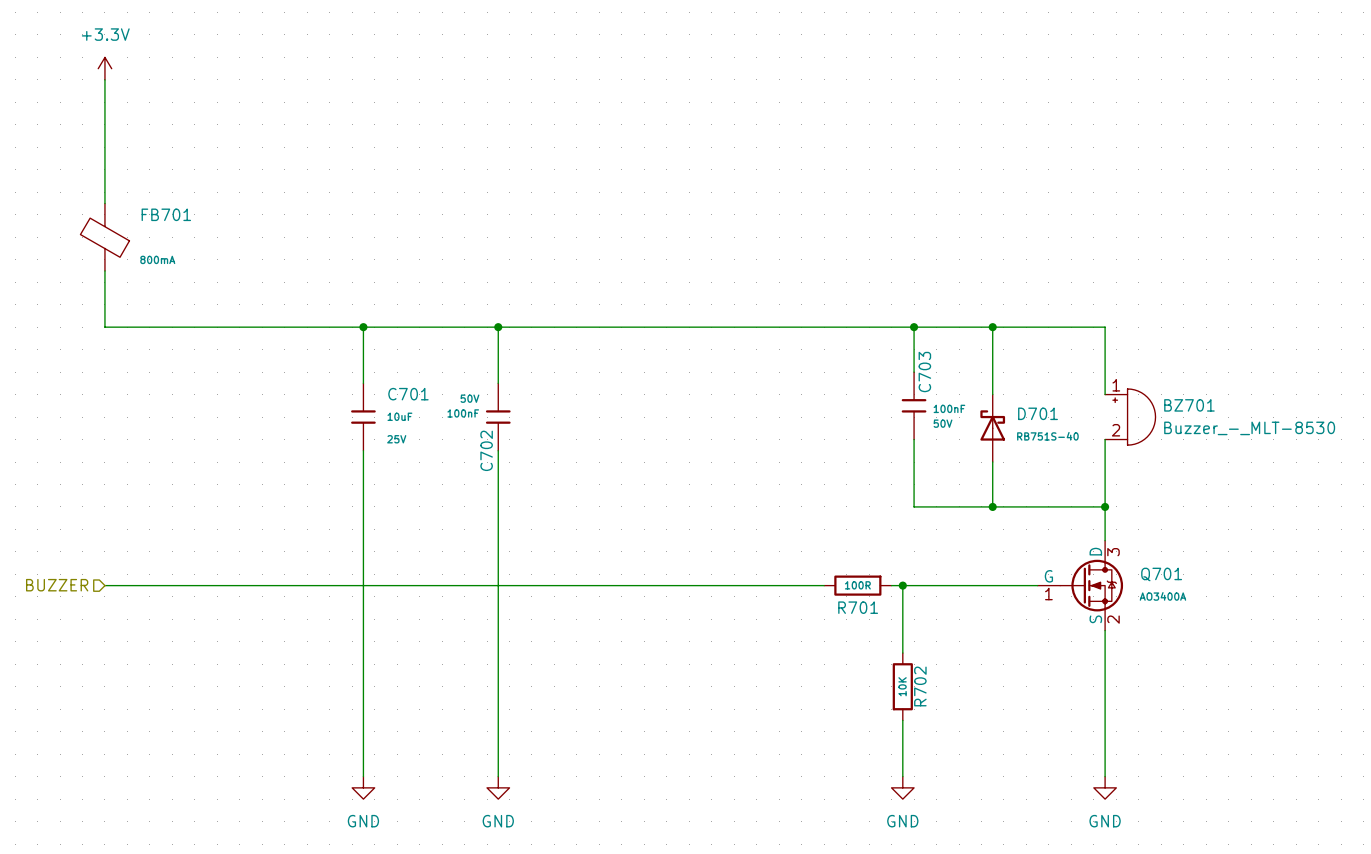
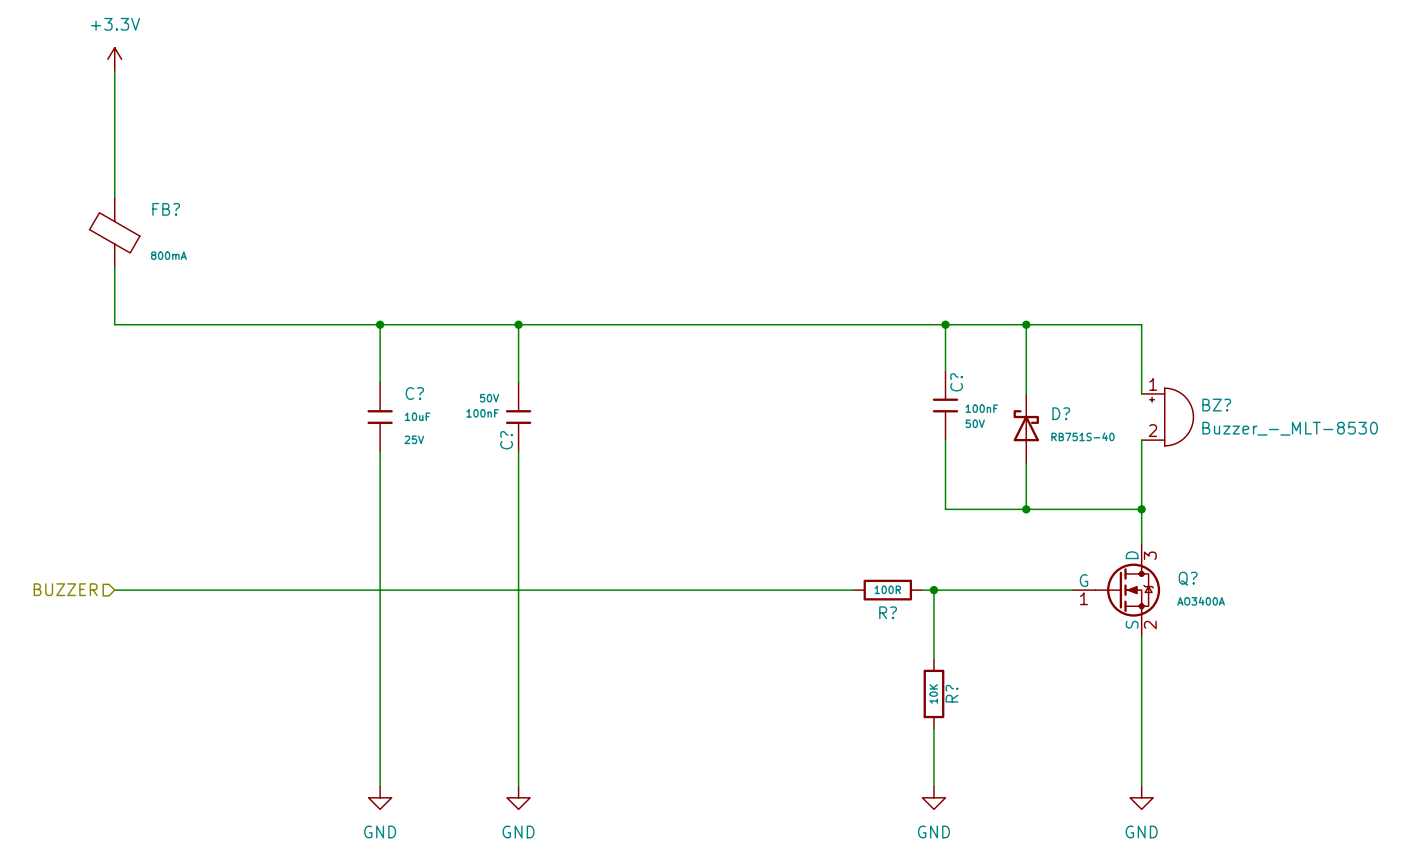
FB701 name: FB701 (166, 214) -> FB? (166, 209)
C703 name: C703 (924, 372) -> C? (956, 382)
C701 name: C701 (408, 394) -> C? (414, 393)
BZ701 name: BZ701 (1189, 405) -> BZ? (1216, 405)
D701 name: D701 (1038, 413) -> D? (1061, 413)
C702 name: C702 (486, 450) -> C? (506, 440)
Q701 name: Q701 (1161, 574) -> Q? (1188, 578)
R701 name: R701 (858, 607) -> R? (888, 612)
R702 name: R702 (920, 686) -> R? (952, 693)

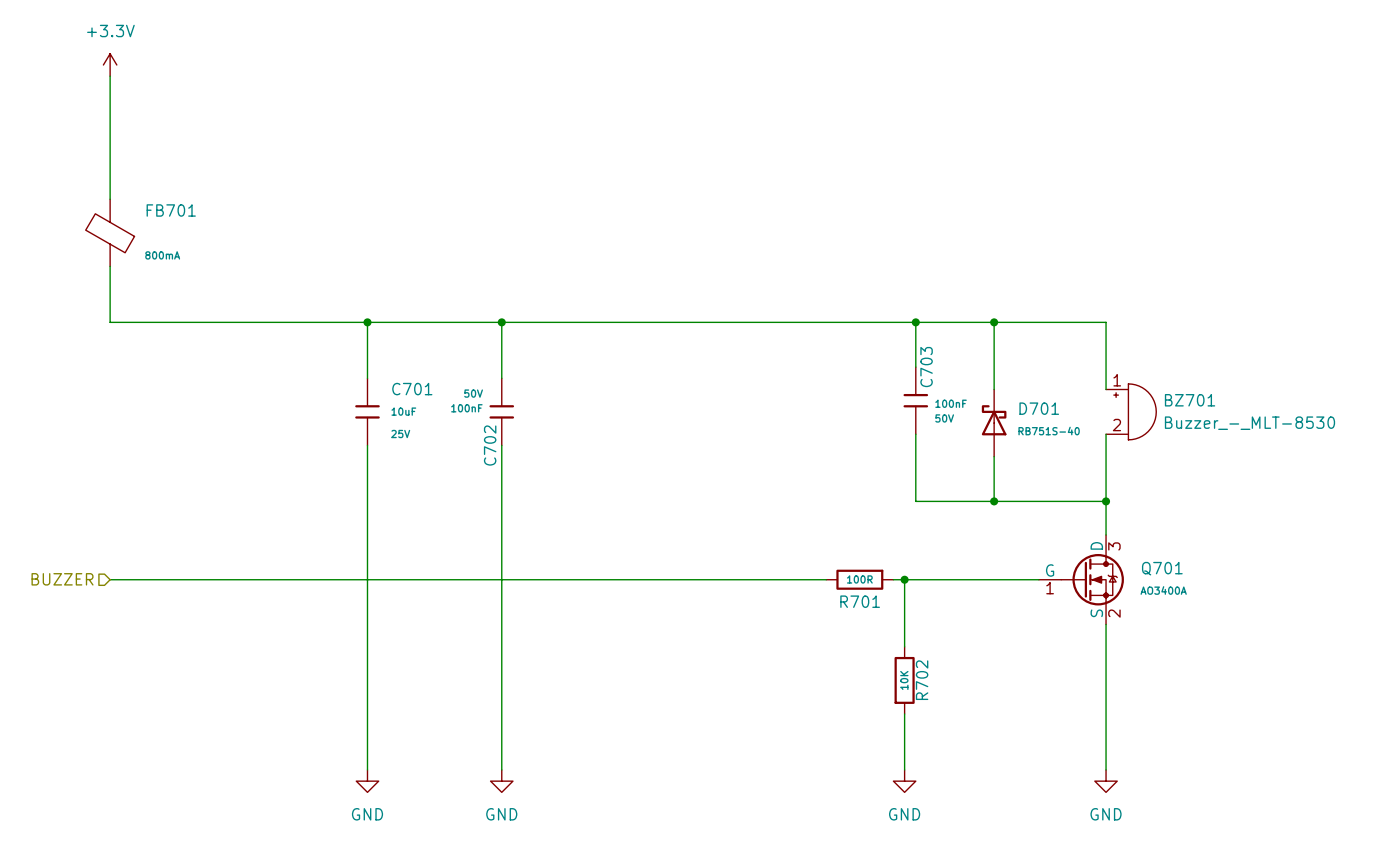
FB? name: FB? (166, 209) -> FB701 (171, 210)
C? name: C? (956, 382) -> C703 (926, 367)
C? name: C? (414, 393) -> C701 (412, 389)
BZ? name: BZ? (1216, 405) -> BZ701 (1190, 400)
D? name: D? (1061, 413) -> D701 (1039, 408)
C? name: C? (506, 440) -> C702 (490, 445)
Q? name: Q? (1188, 578) -> Q701 (1162, 568)
R? name: R? (888, 612) -> R701 (860, 601)
R? name: R? (952, 693) -> R702 (922, 680)

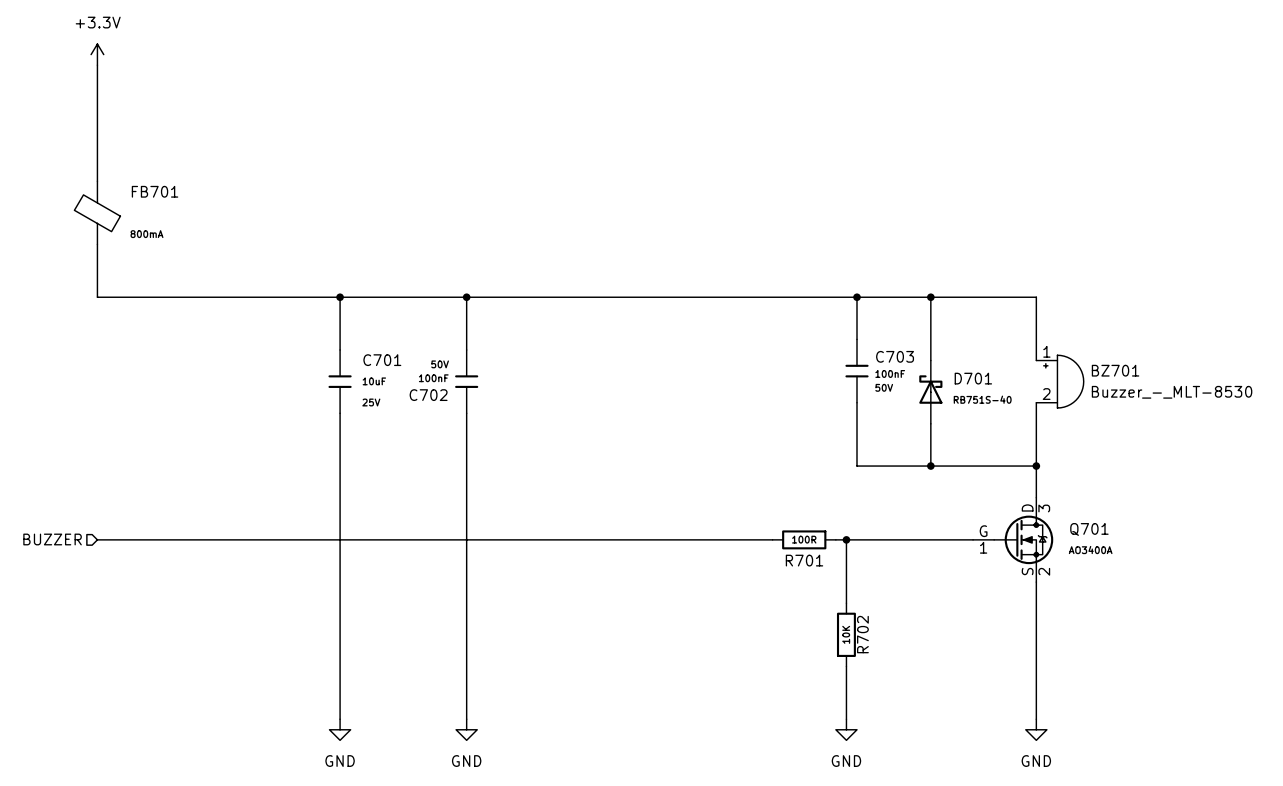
C703 name rotation: 0° (926, 367) -> 90° clockwise (895, 356)
C702 name rotation: 0° (490, 445) -> 90° clockwise (428, 395)

